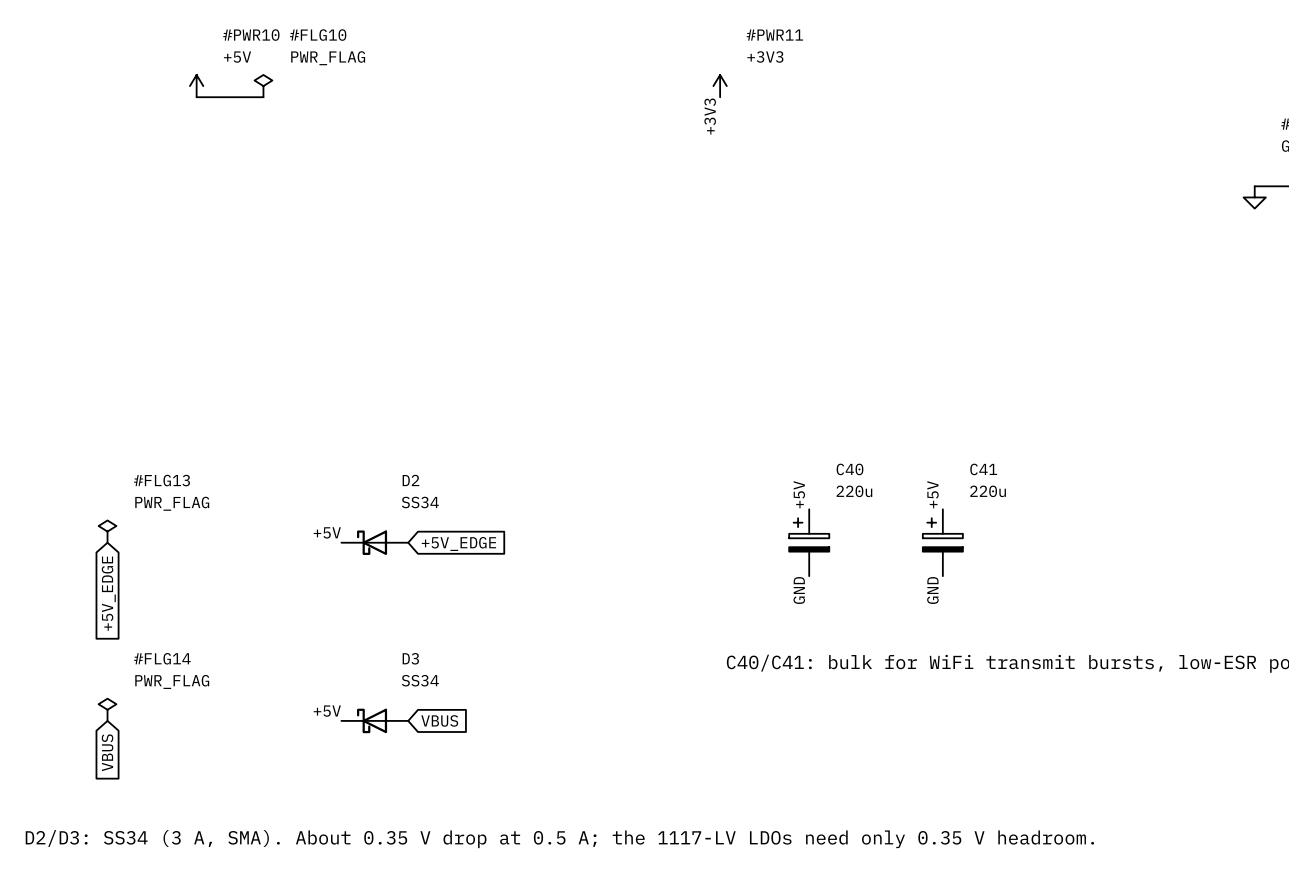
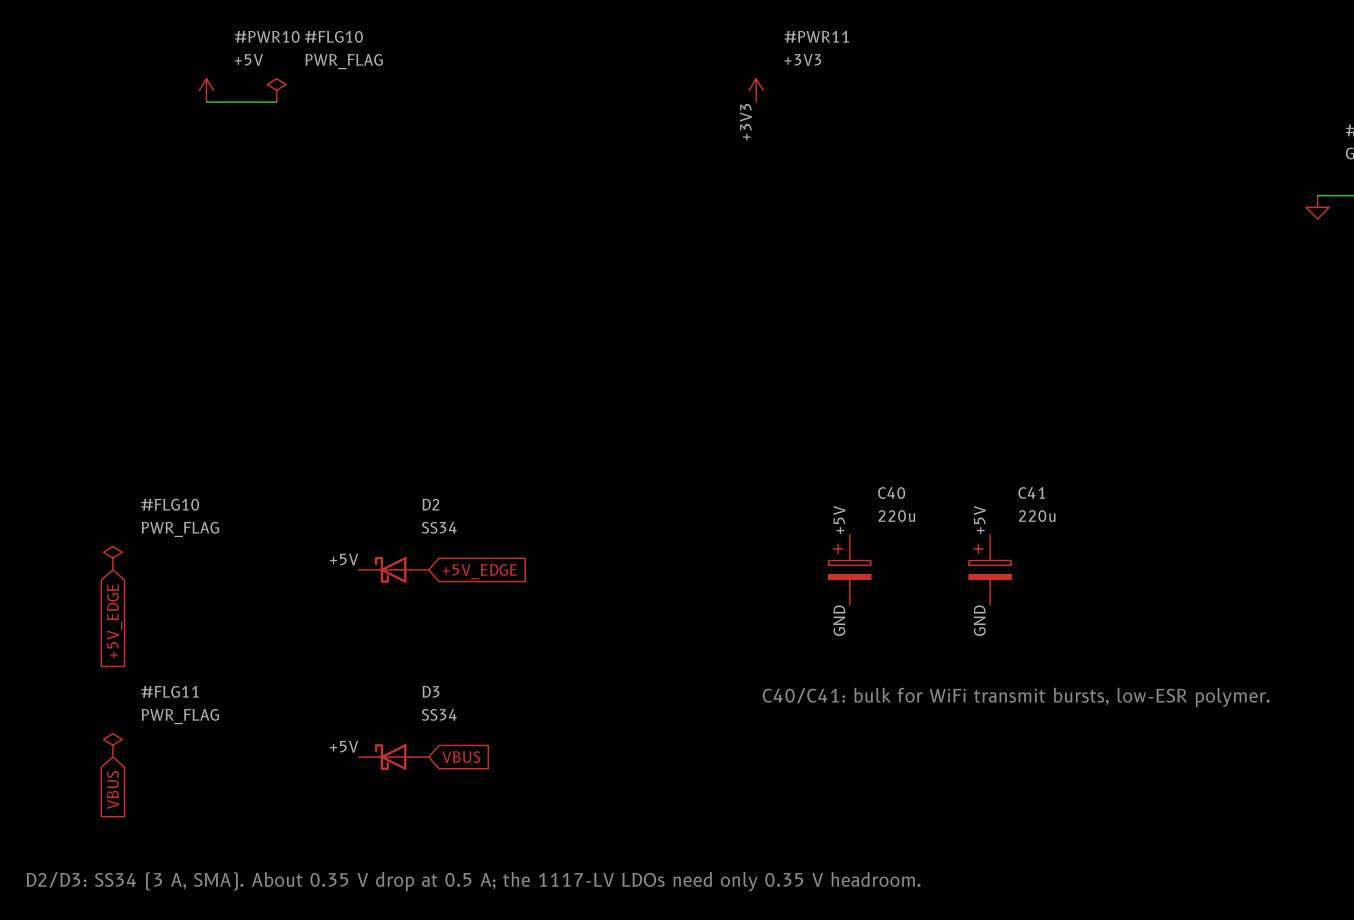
#FLG13 name: #FLG13 (162, 480) -> #FLG10 (170, 504)
#FLG14 name: #FLG14 (162, 658) -> #FLG11 (169, 691)

